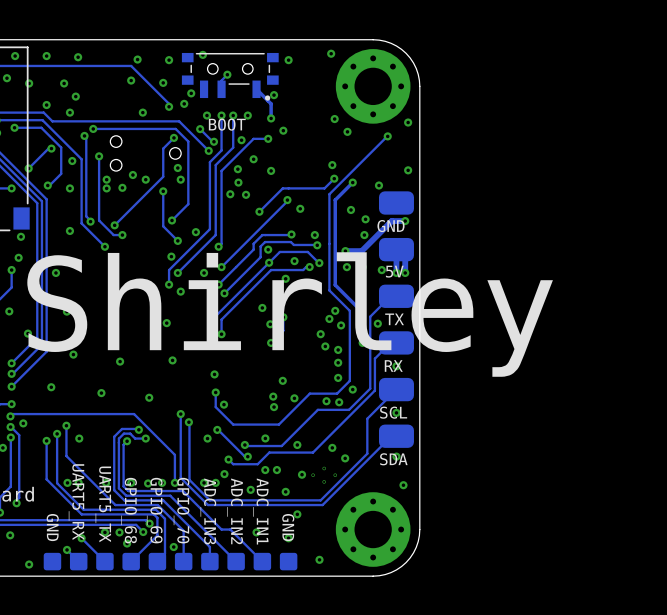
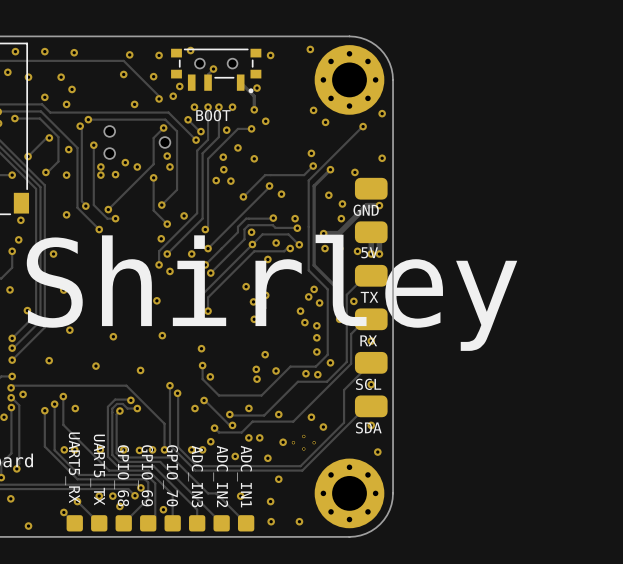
text: GND (52, 527) -> none
text: GND (288, 527) -> none
via: none -> (271, 521)
part: (104, 561) -> none
part: (236, 561) -> none

